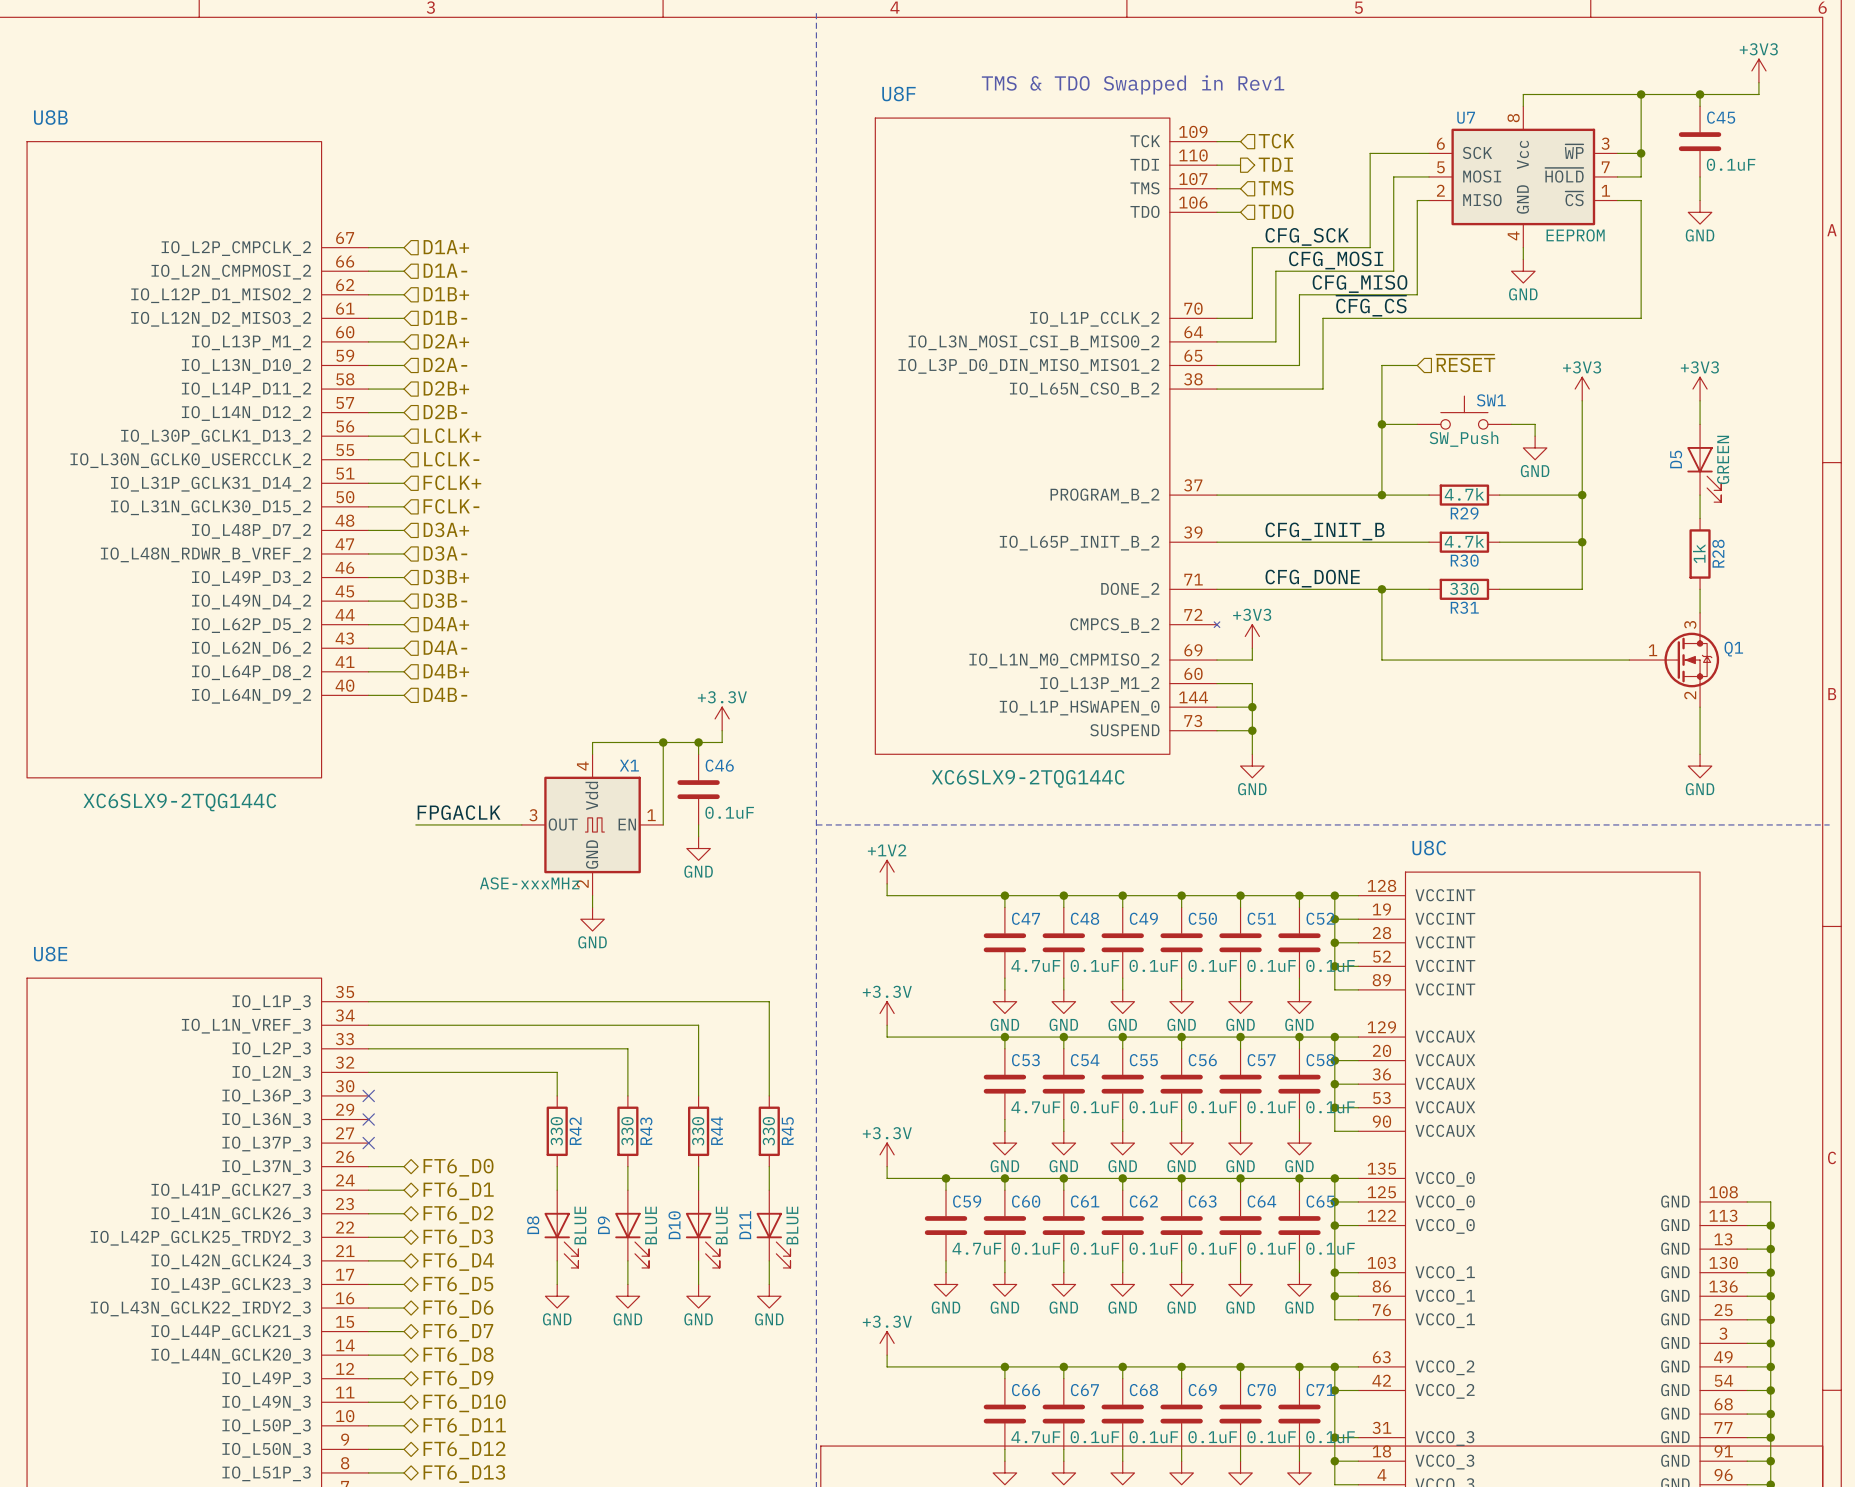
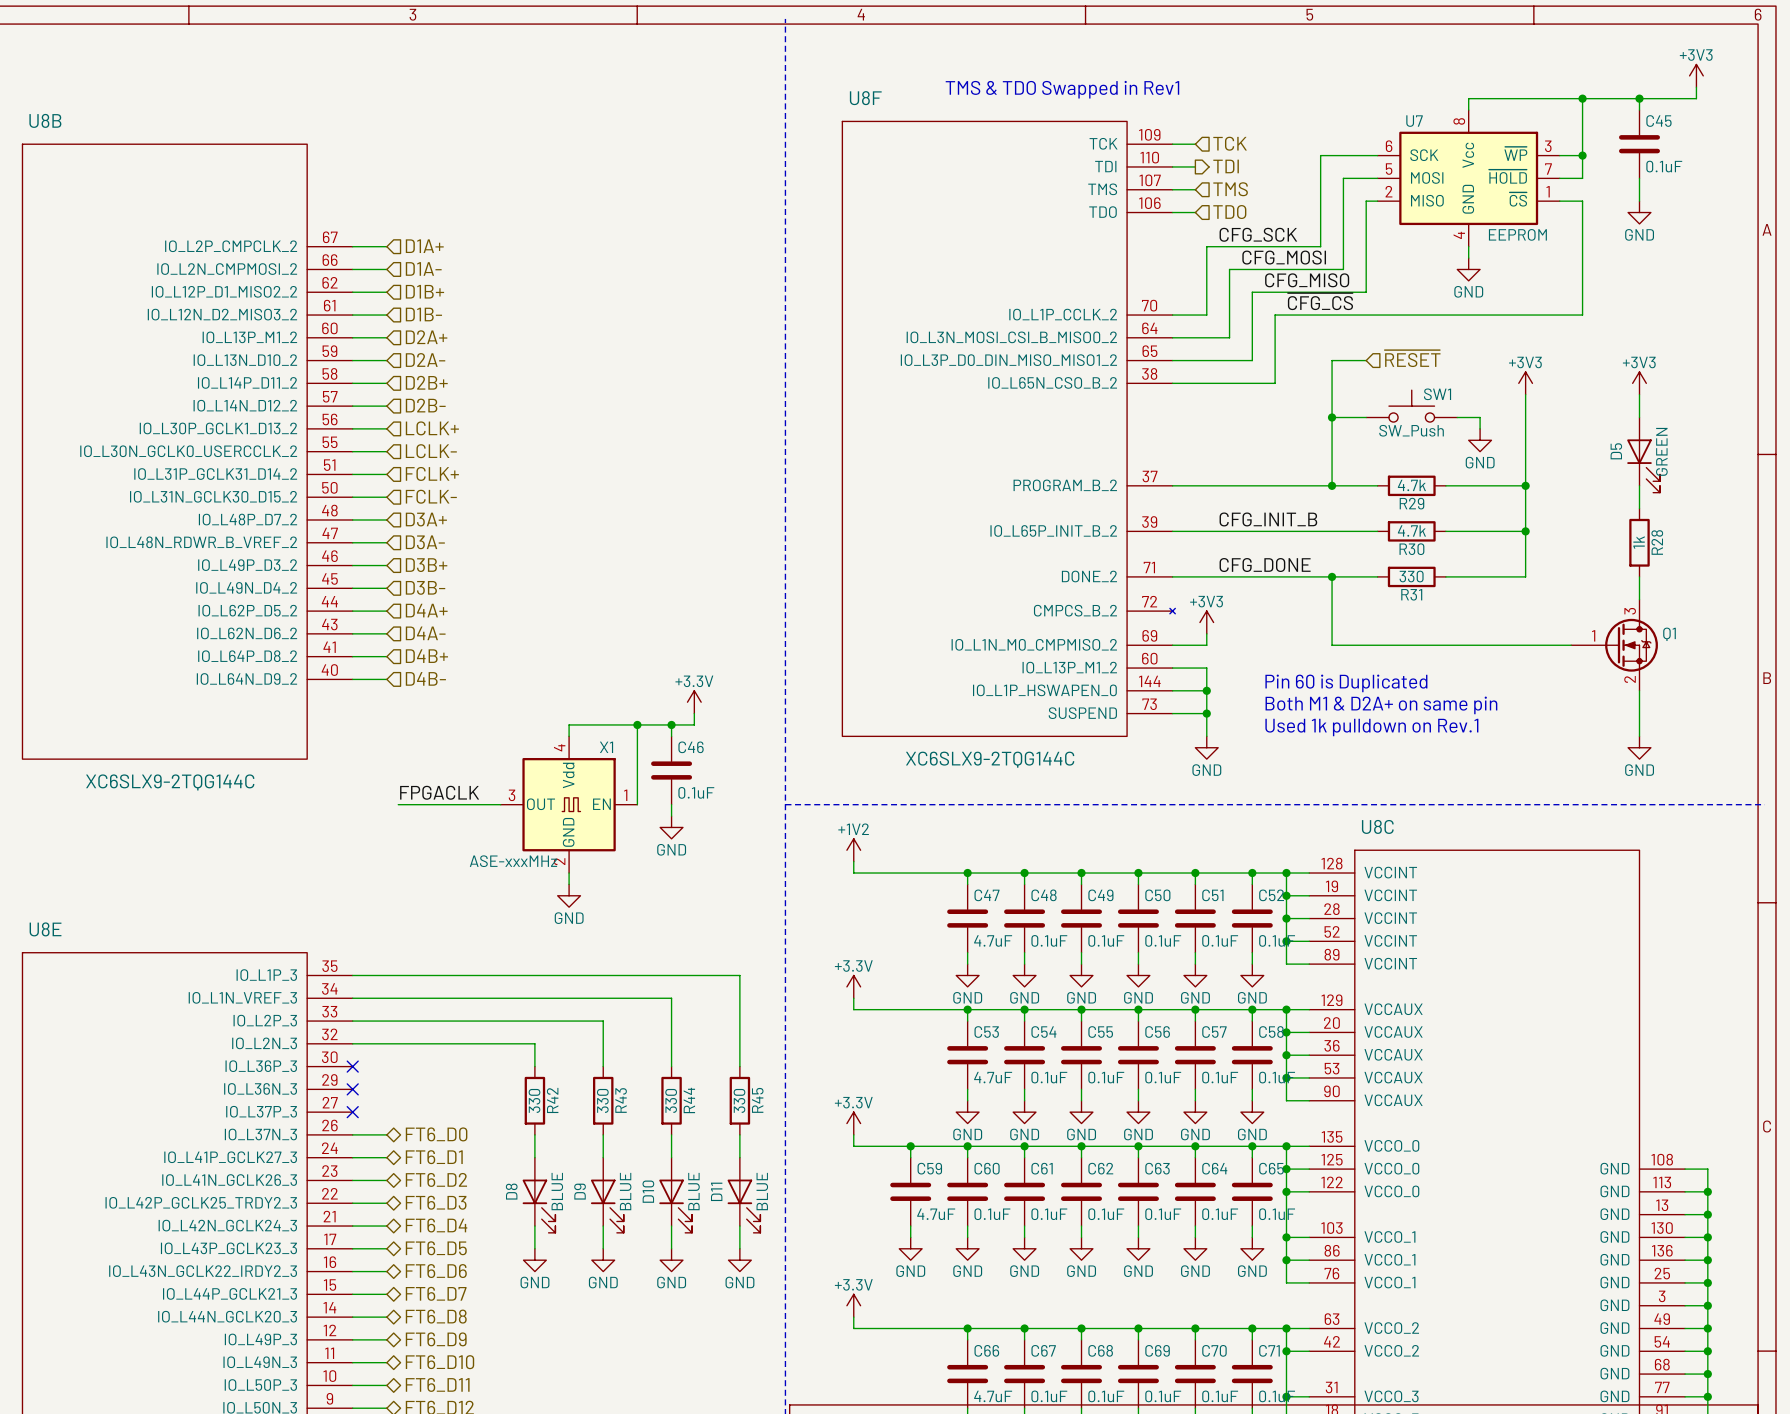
text: none -> Pin 60 is Duplicated (1346, 683)
text: none -> Both M1 & D2A+ on same pin (1381, 705)
text: none -> Used 1k pulldown on Rev.1 (1371, 727)

